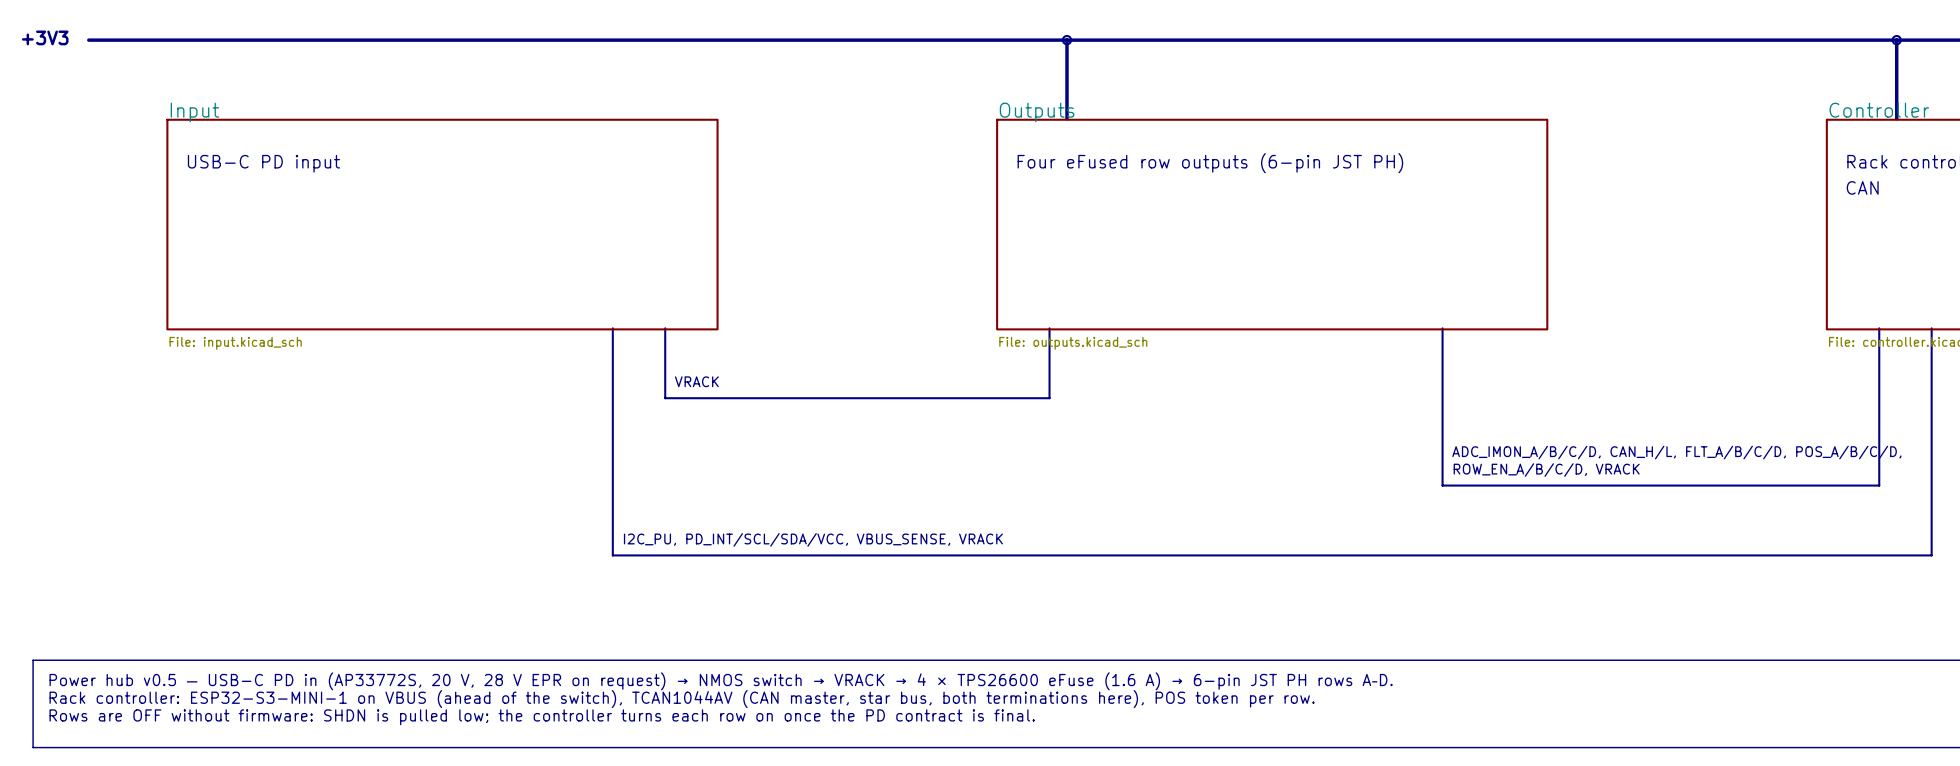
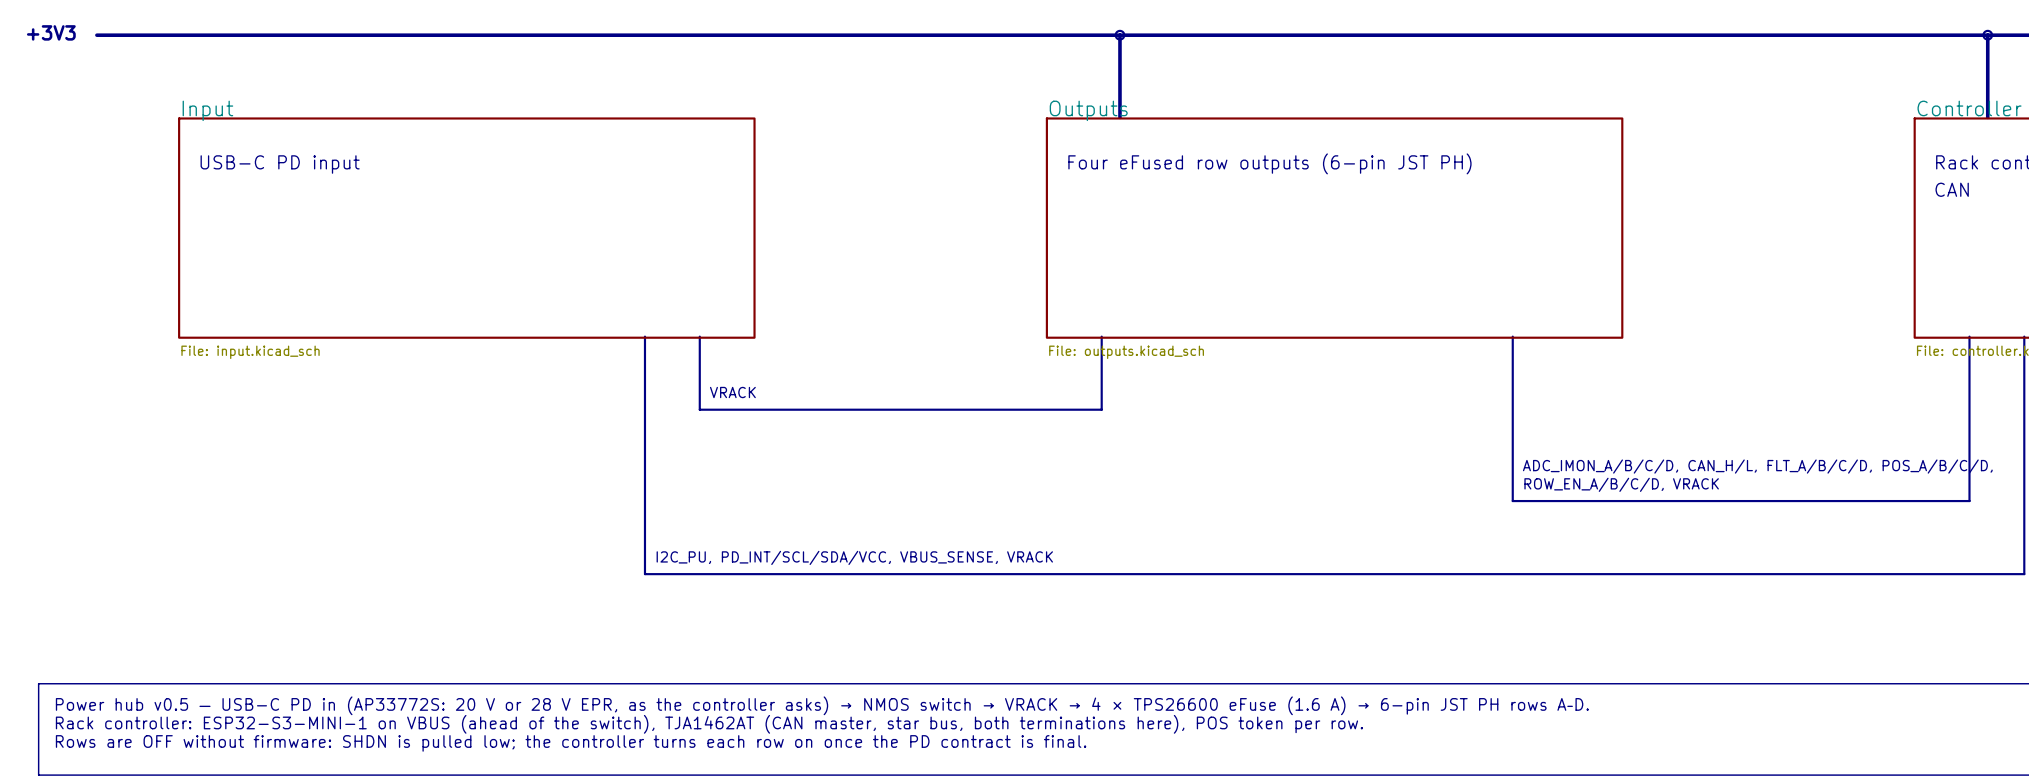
text: Power hub v0.5 — USB-C PD in (AP33772S, 20 V, 28 V EPR on request) → NMOS switch → VRACK → 4 × TPS26600 eFuse (1.6 A) → 6-pin JST PH rows A–D. (721, 681) -> Power hub v0.5 — USB-C PD in (AP33772S: 20 V or 28 V EPR, as the controller asks) → NMOS switch → VRACK → 4 × TPS26600 eFuse (1.6 A) → 6-pin JST PH rows A–D. (822, 705)
text: Rack controller: ESP32-S3-MINI-1 on VBUS (ahead of the switch), TCAN1044AV (CAN master, star bus, both terminations here), POS token per row. (682, 699) -> Rack controller: ESP32-S3-MINI-1 on VBUS (ahead of the switch), TJA1462AT (CAN master, star bus, both terminations here), POS token per row. (709, 724)

